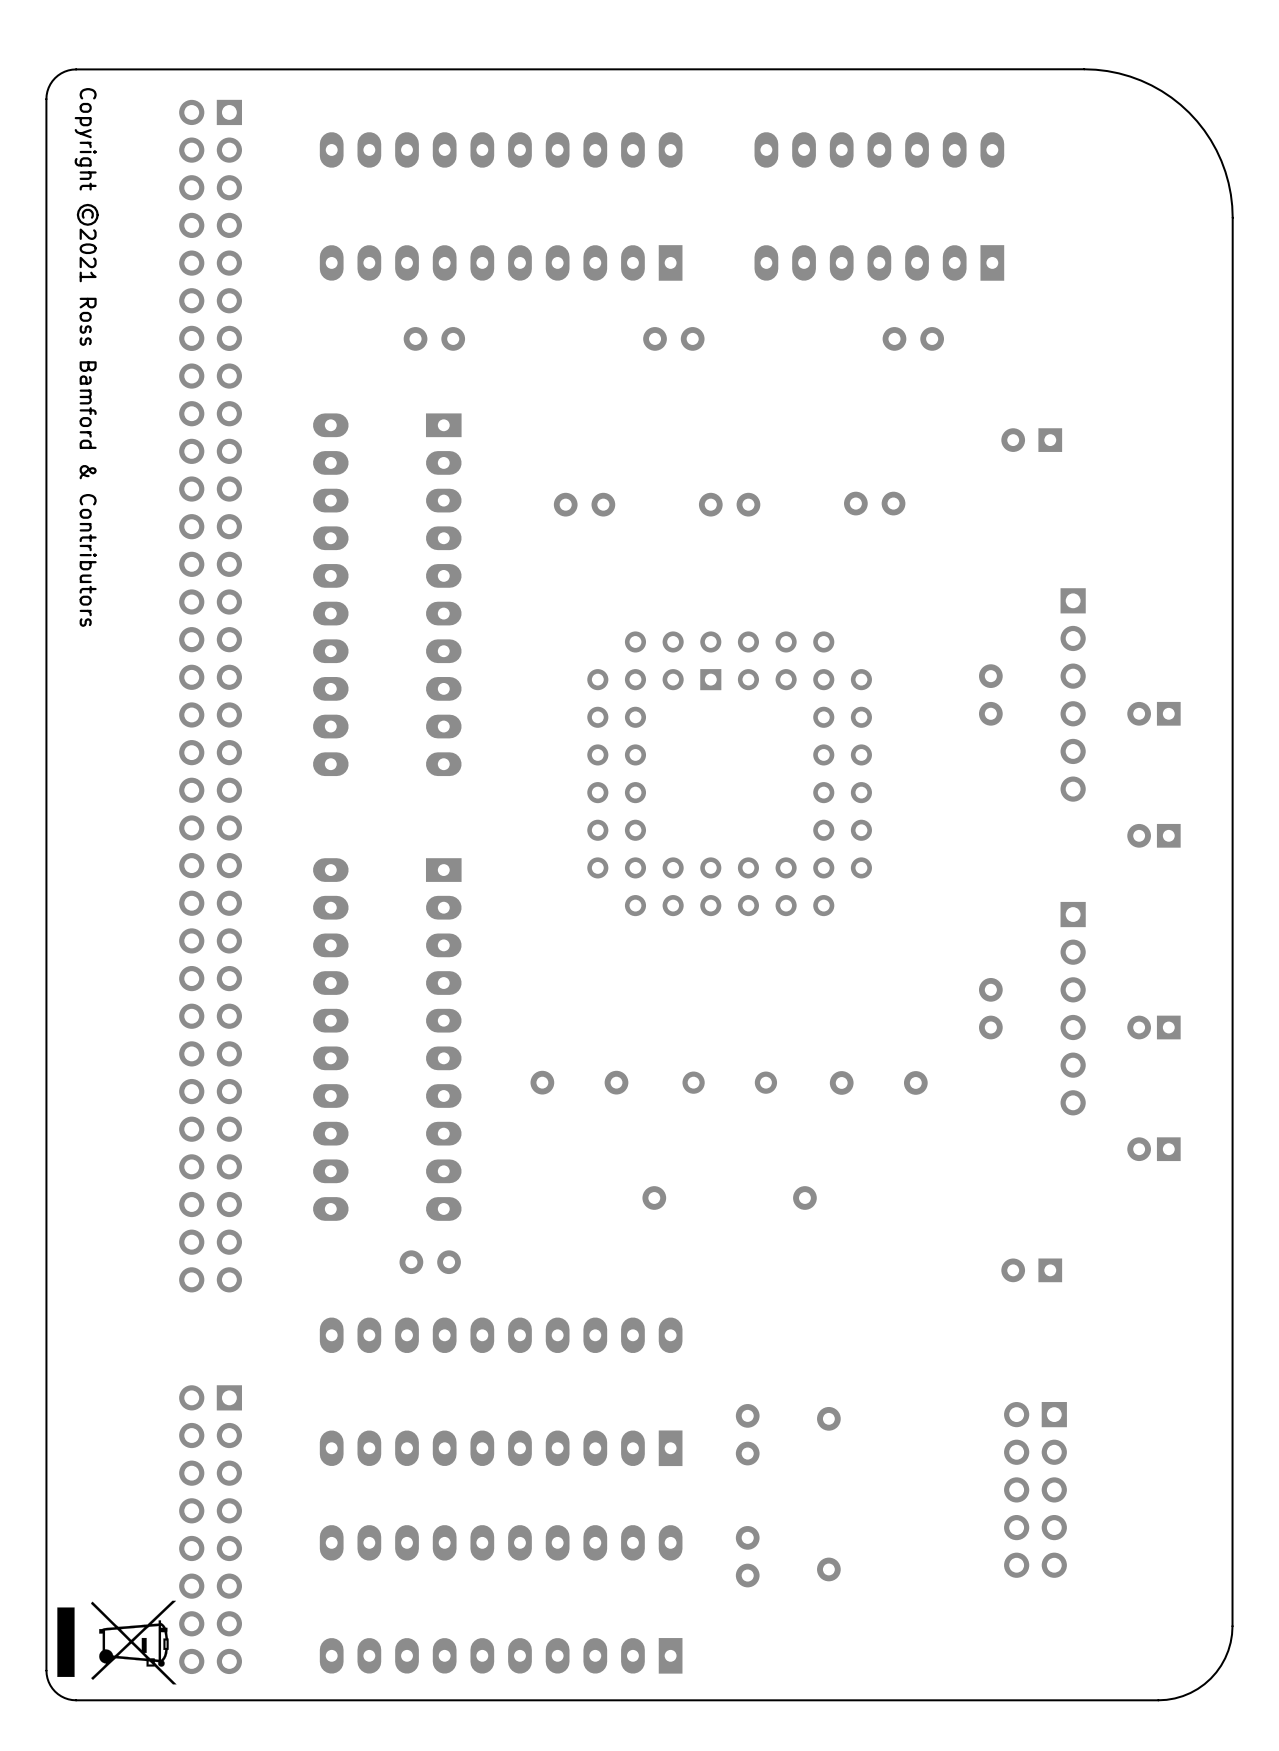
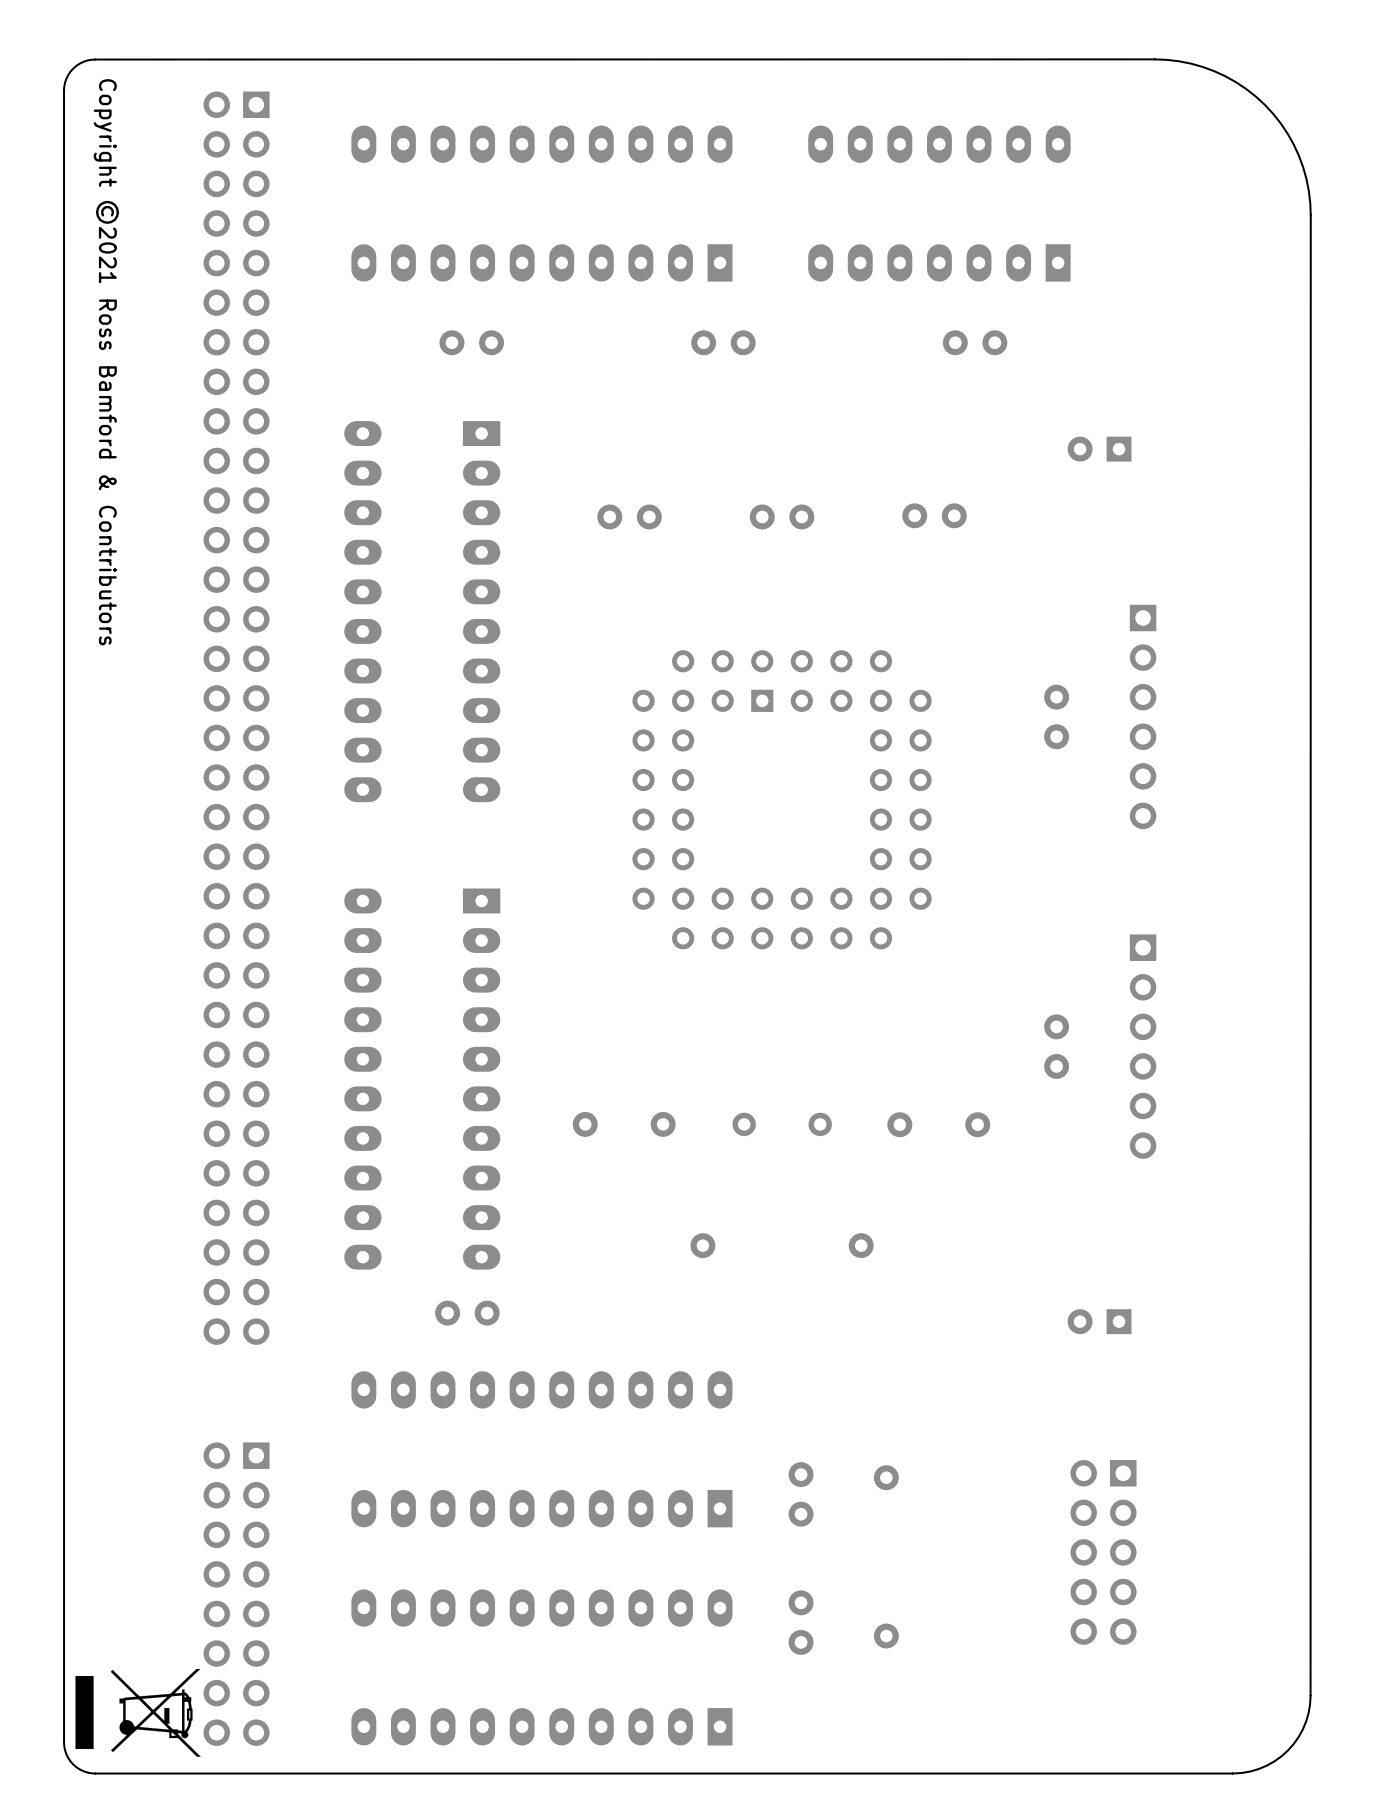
part: (1153, 713) -> none
part: (1153, 835) -> none
part: (1153, 1027) -> none
part: (1153, 1149) -> none

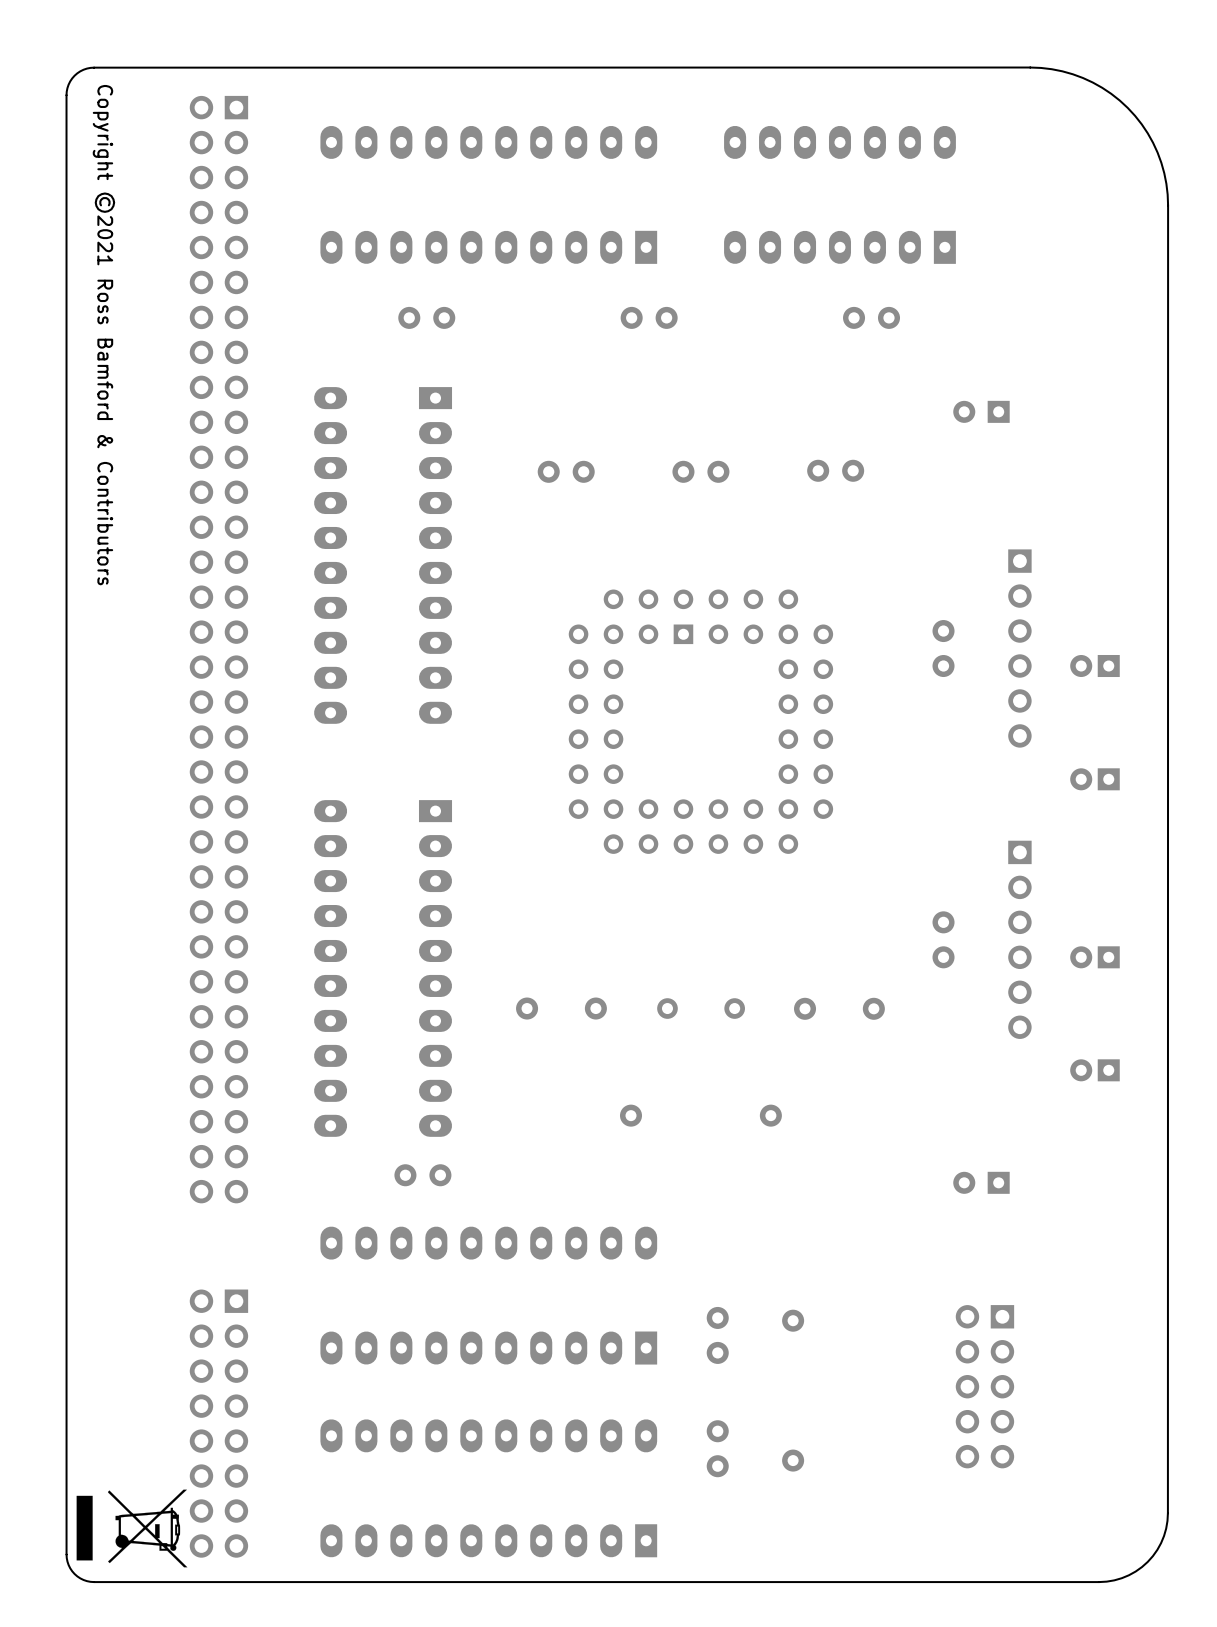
part: none -> (1094, 666)
part: none -> (1094, 779)
part: none -> (1094, 957)
part: none -> (1094, 1070)

